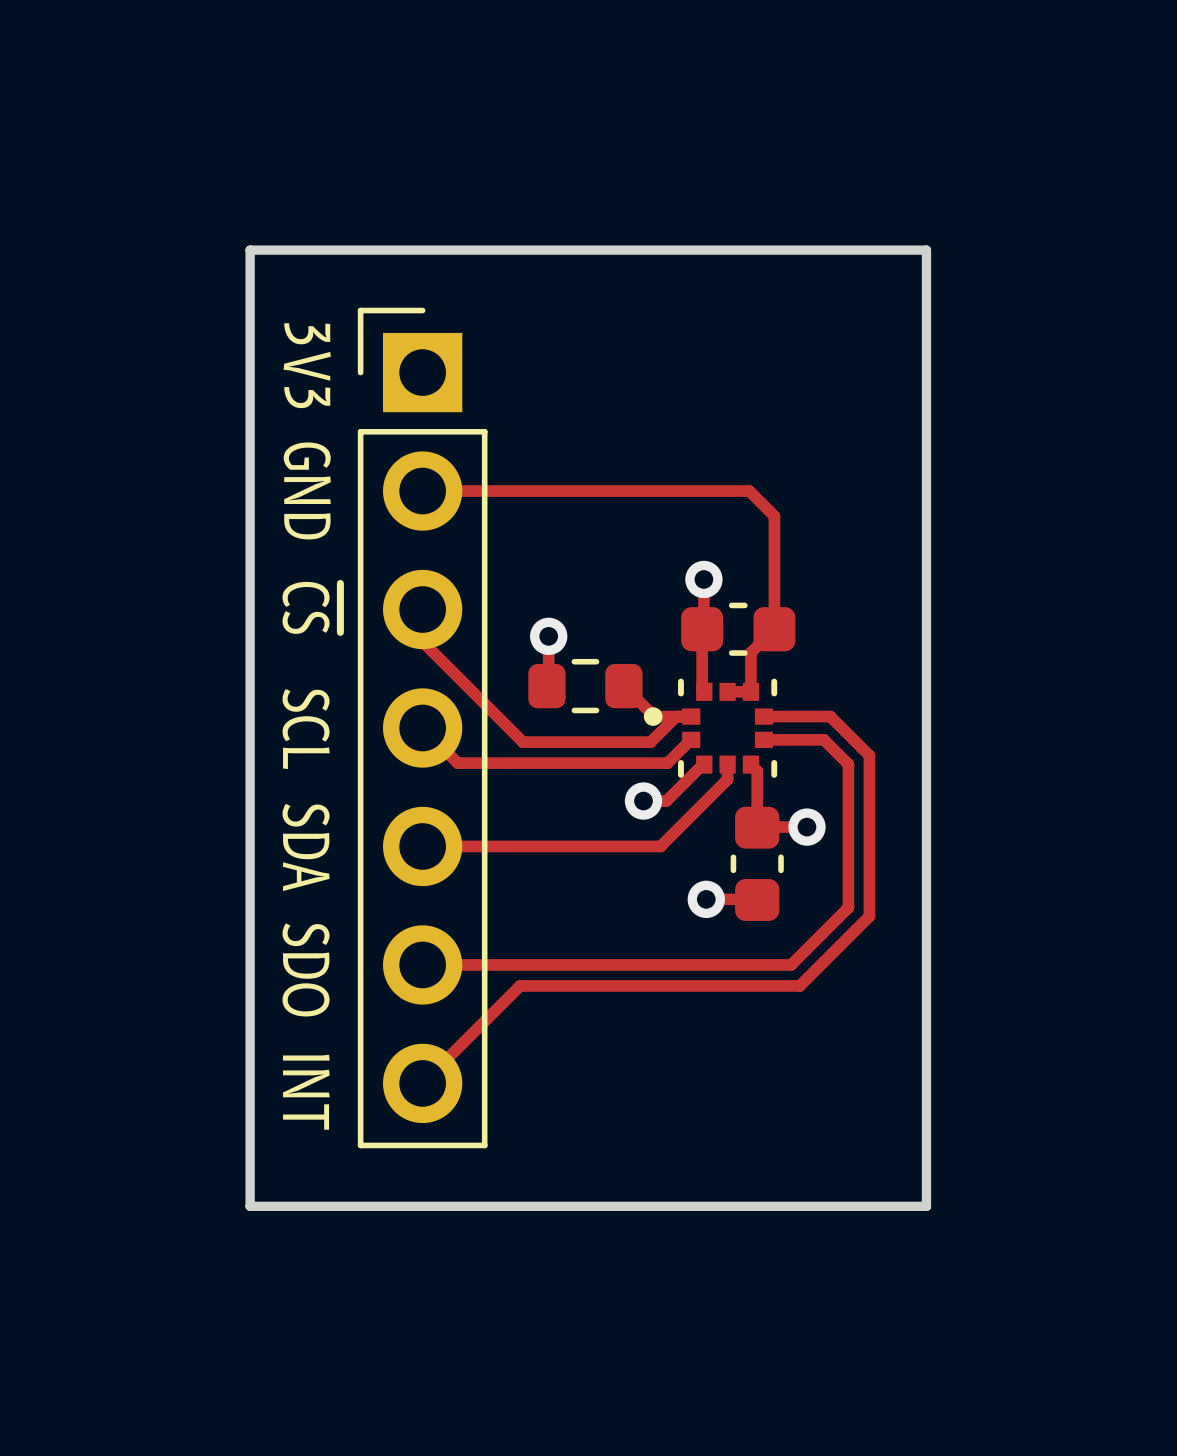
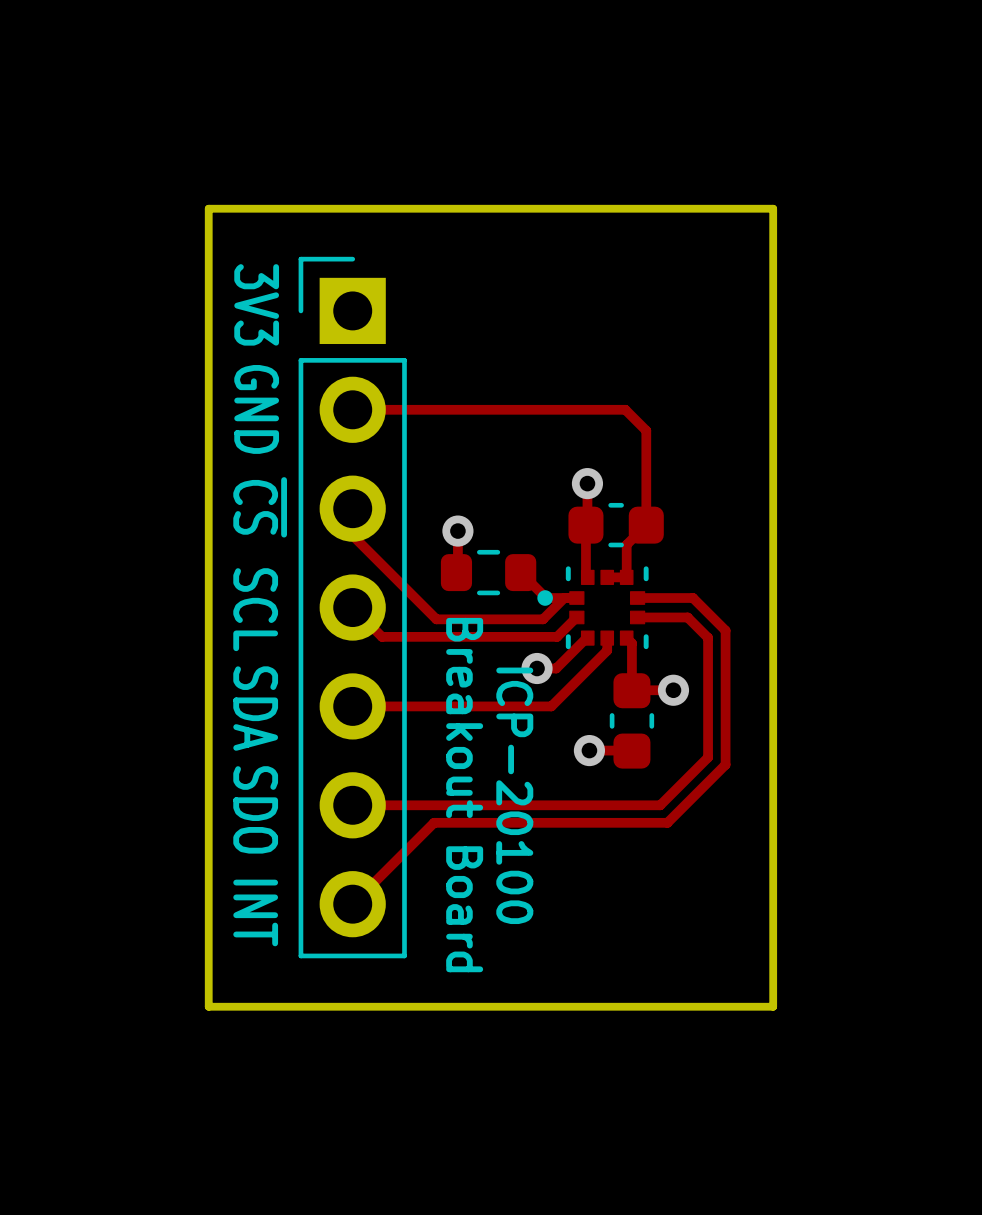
text: none -> Breakout Board (464, 795)
text: none -> ICP-20100 (514, 795)

